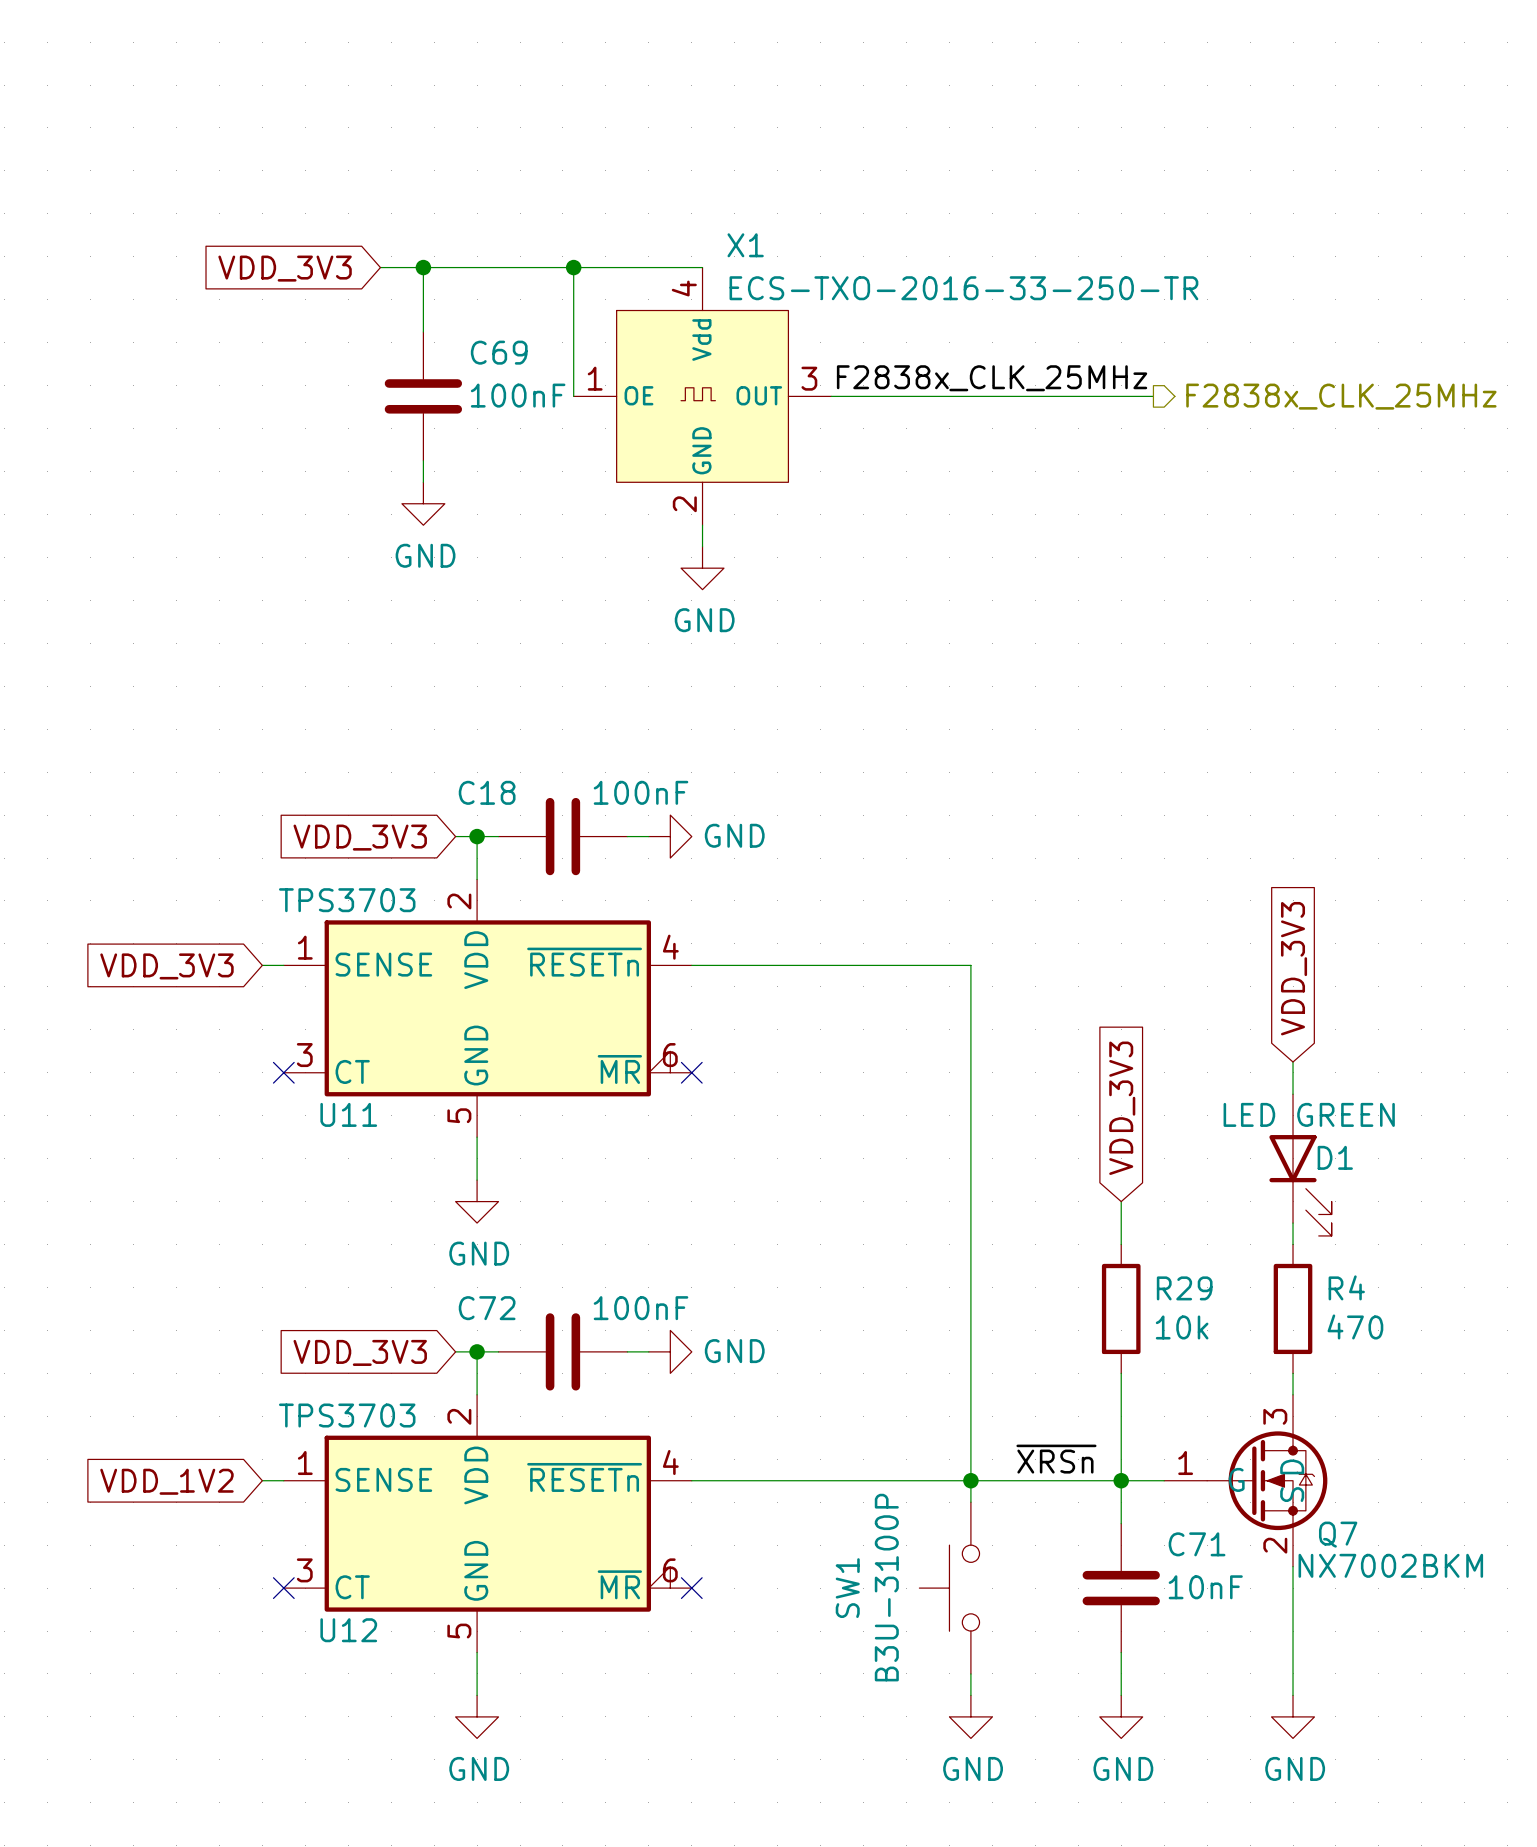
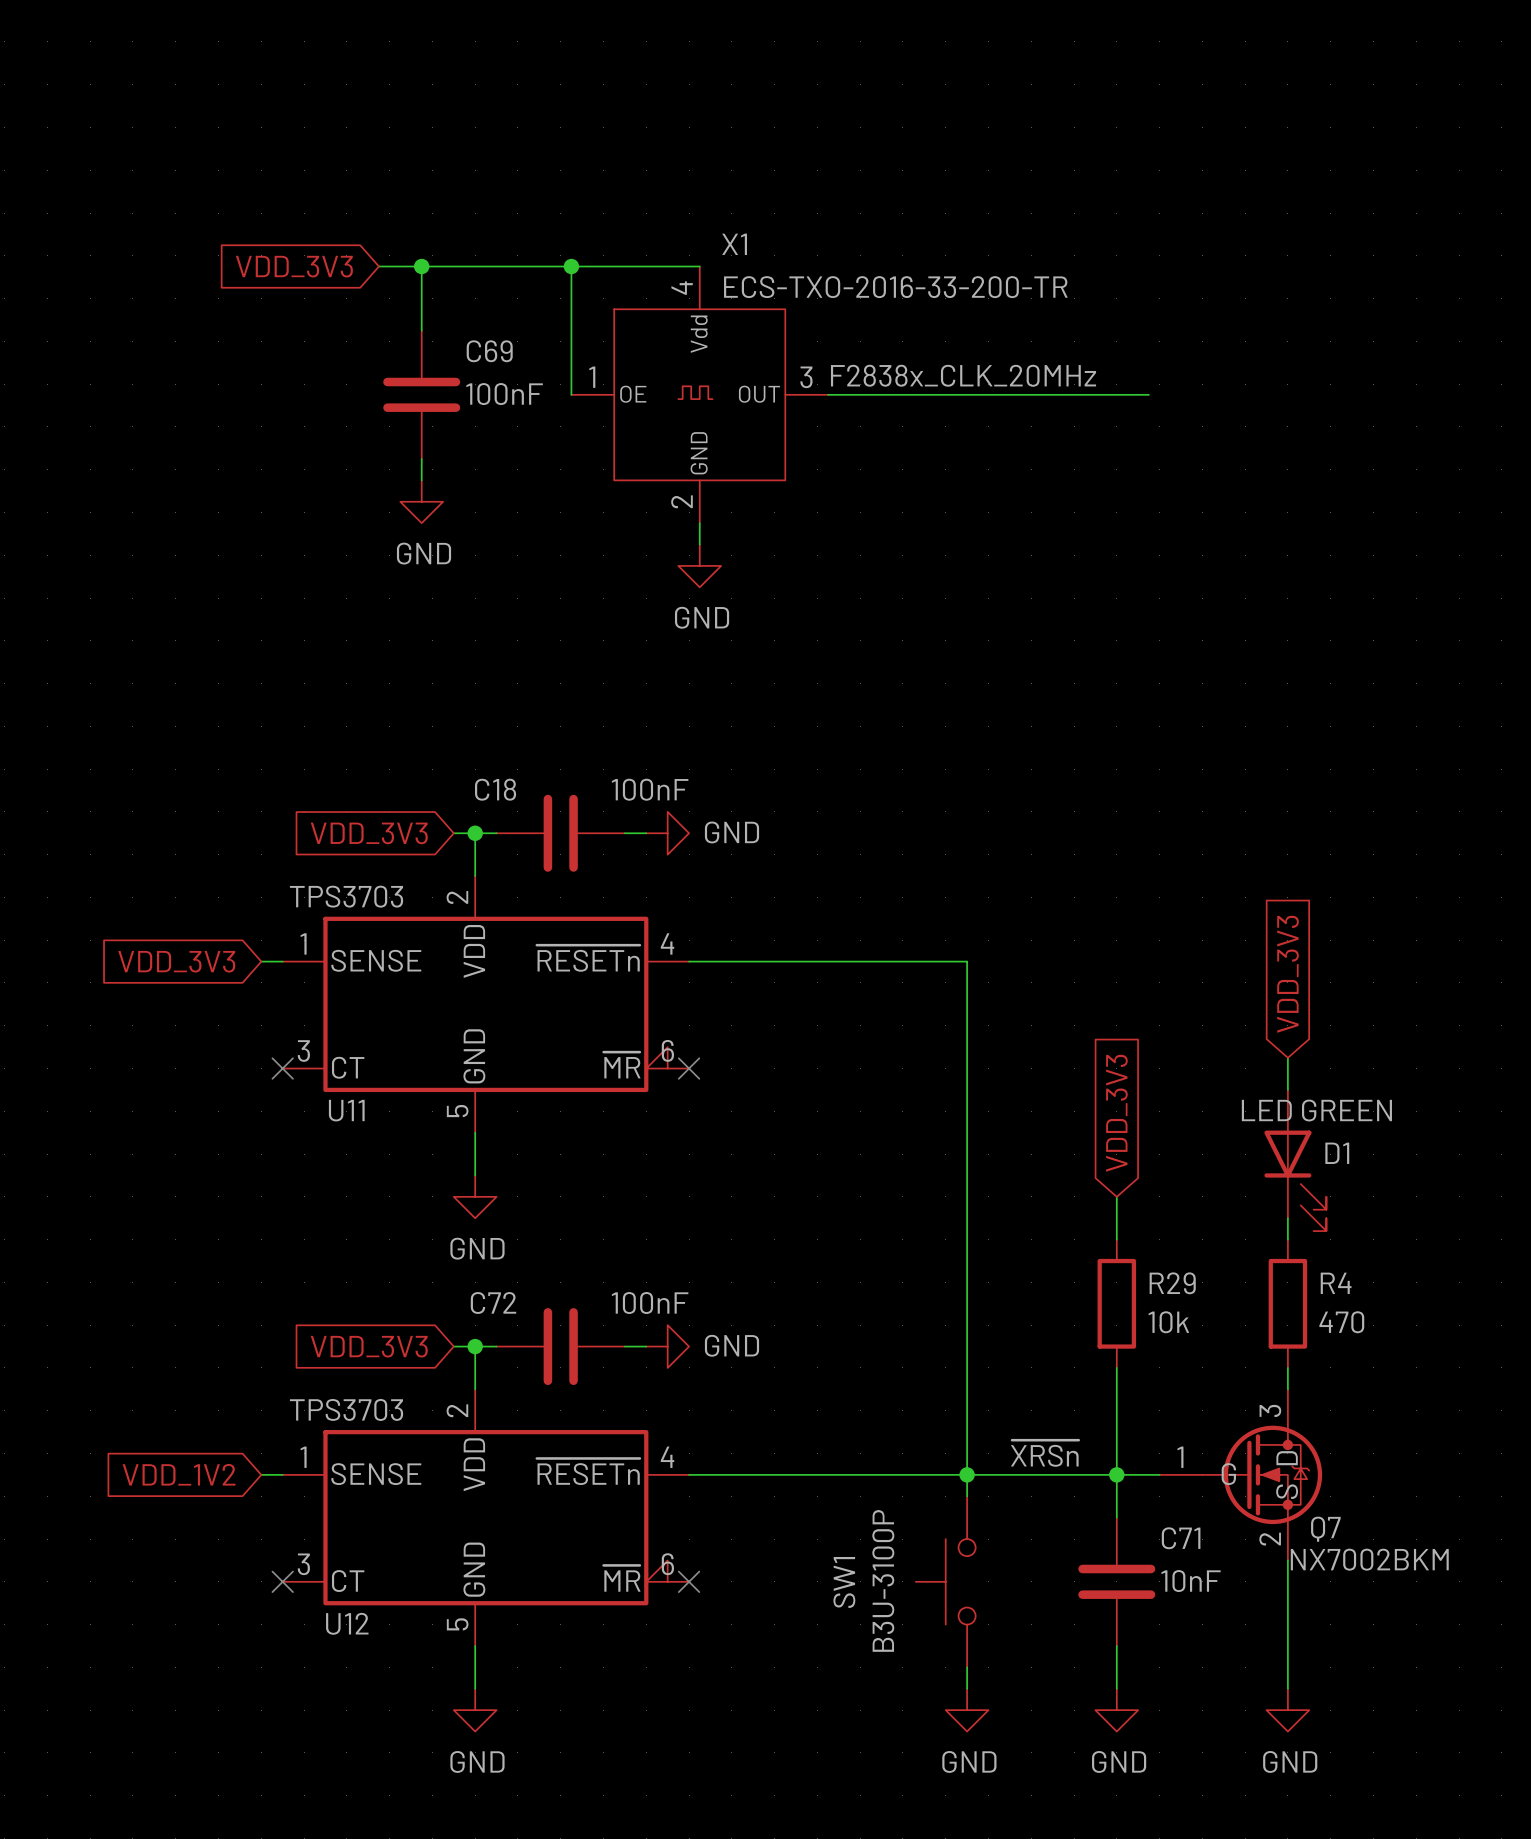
X1 value: ECS-TXO-2016-33-250-TR (963, 288) -> ECS-TXO-2016-33-200-TR (895, 287)
label: F2838x_CLK_25MHz (992, 378) -> F2838x_CLK_20MHz (963, 375)
hierarchical label: F2838x_CLK_25MHz (1341, 396) -> none

